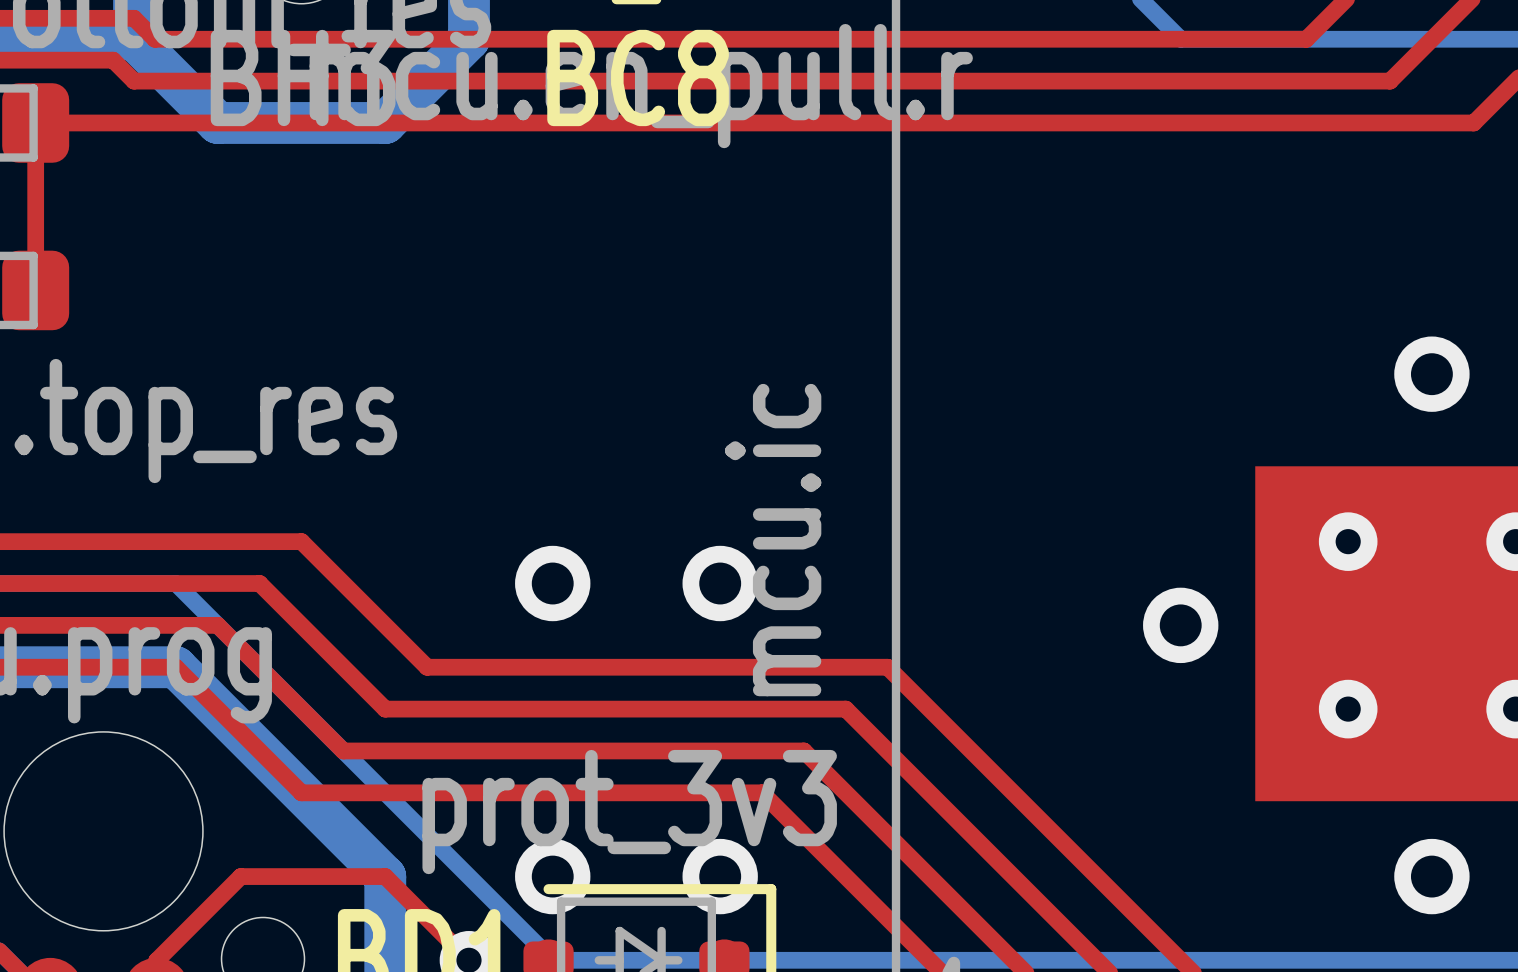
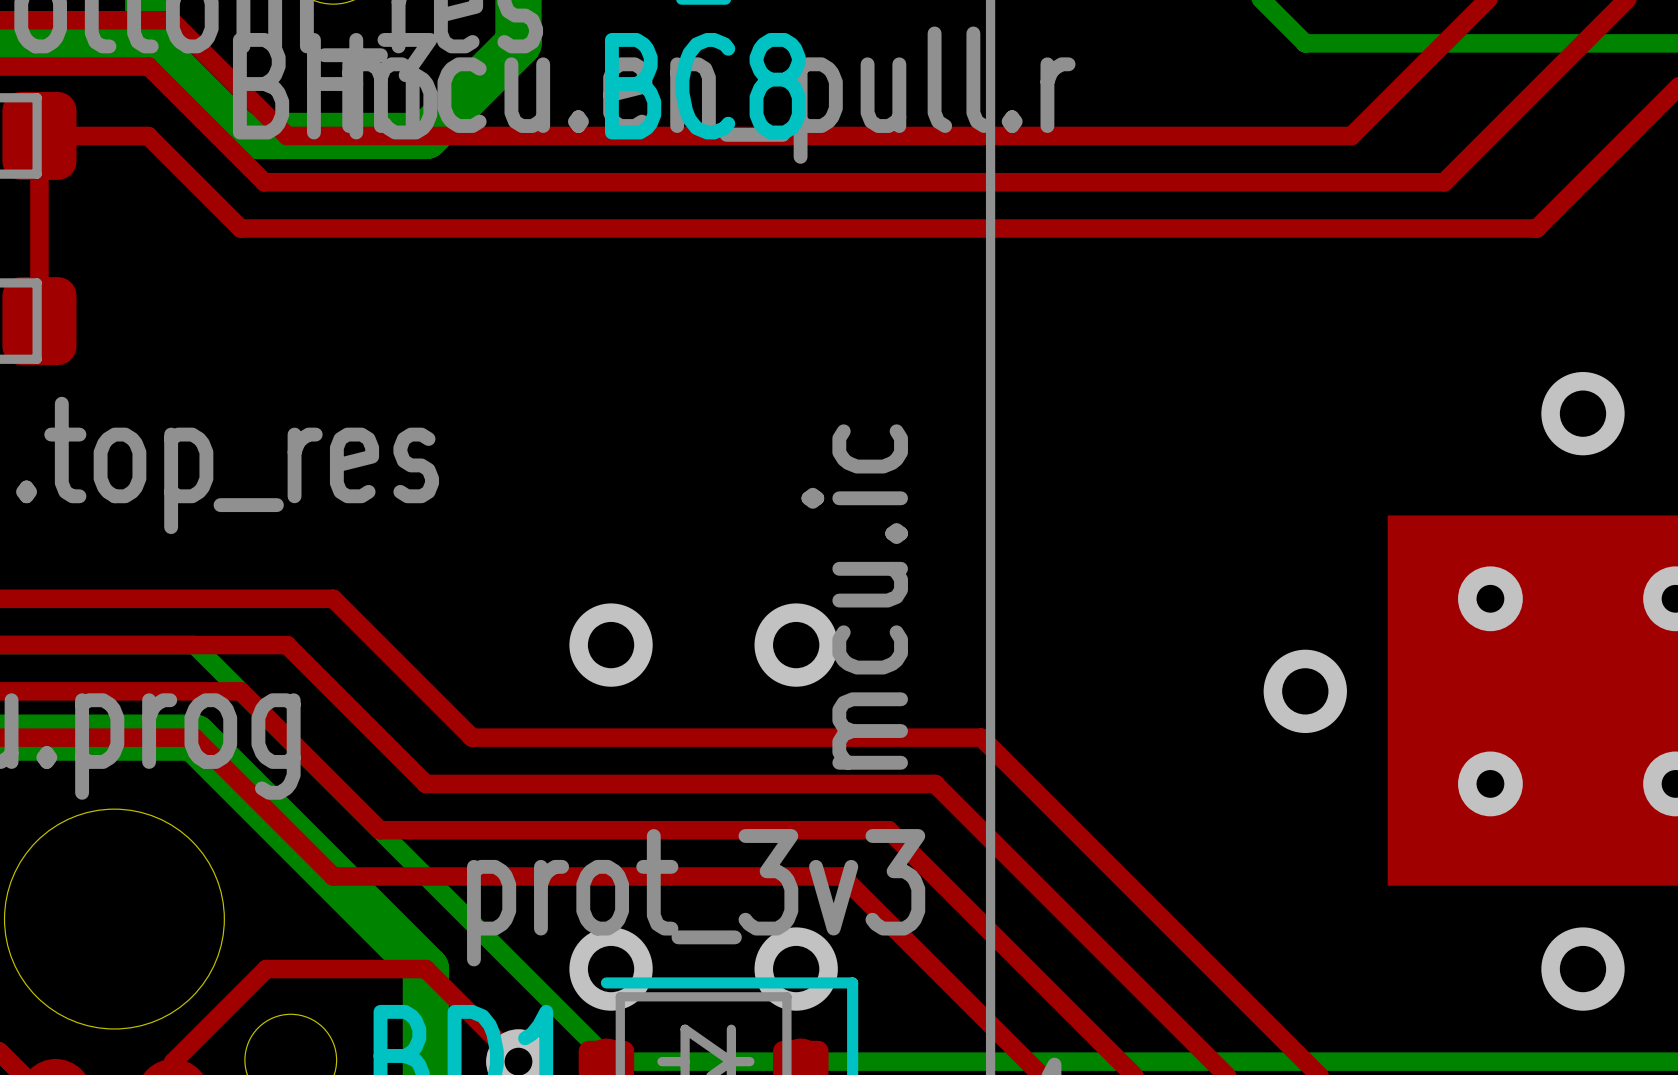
top track: (134, 18) (155, 39) (1306, 39) -> none
top track: (113, 60) (134, 81) (1390, 81) -> (125, 66) (148, 66) (264, 182) (1444, 182) (1536, 89)
top track: (134, 122) (259, 122) -> (148, 20) (171, 20) (287, 135)
top track: none -> (148, 135) (240, 228) (1536, 228) (1629, 135)
top track: (1222, 122) (1473, 122) -> (1351, 135) (1444, 43)

